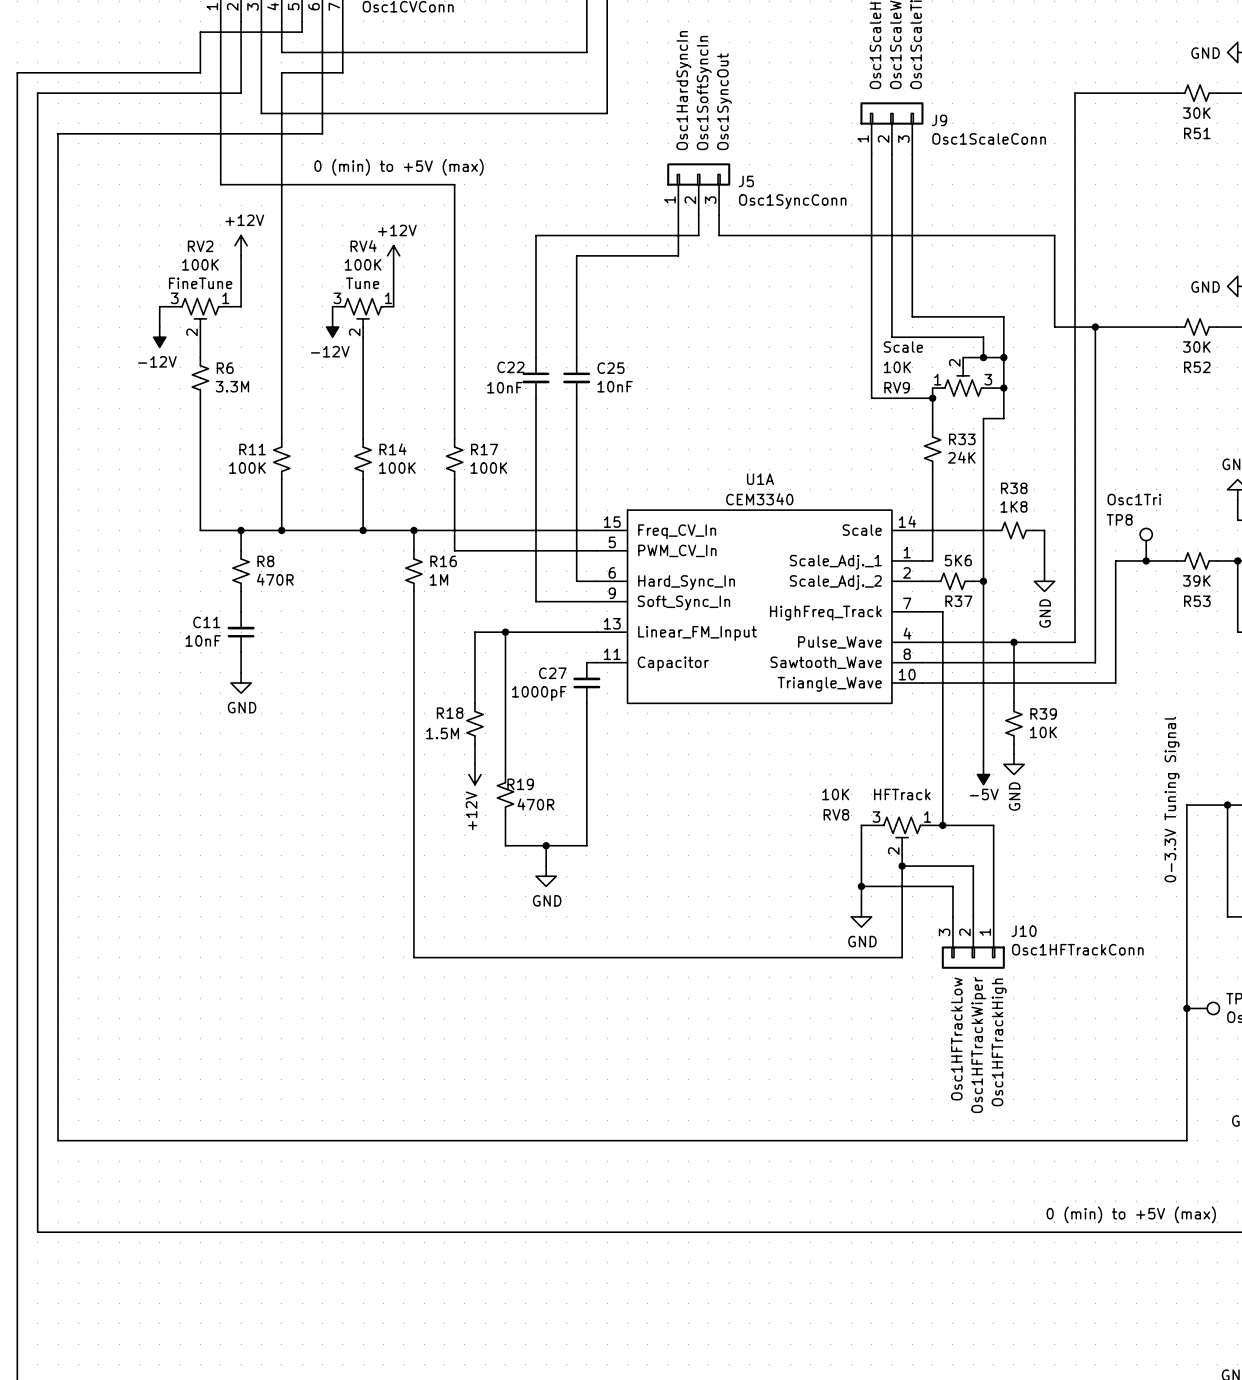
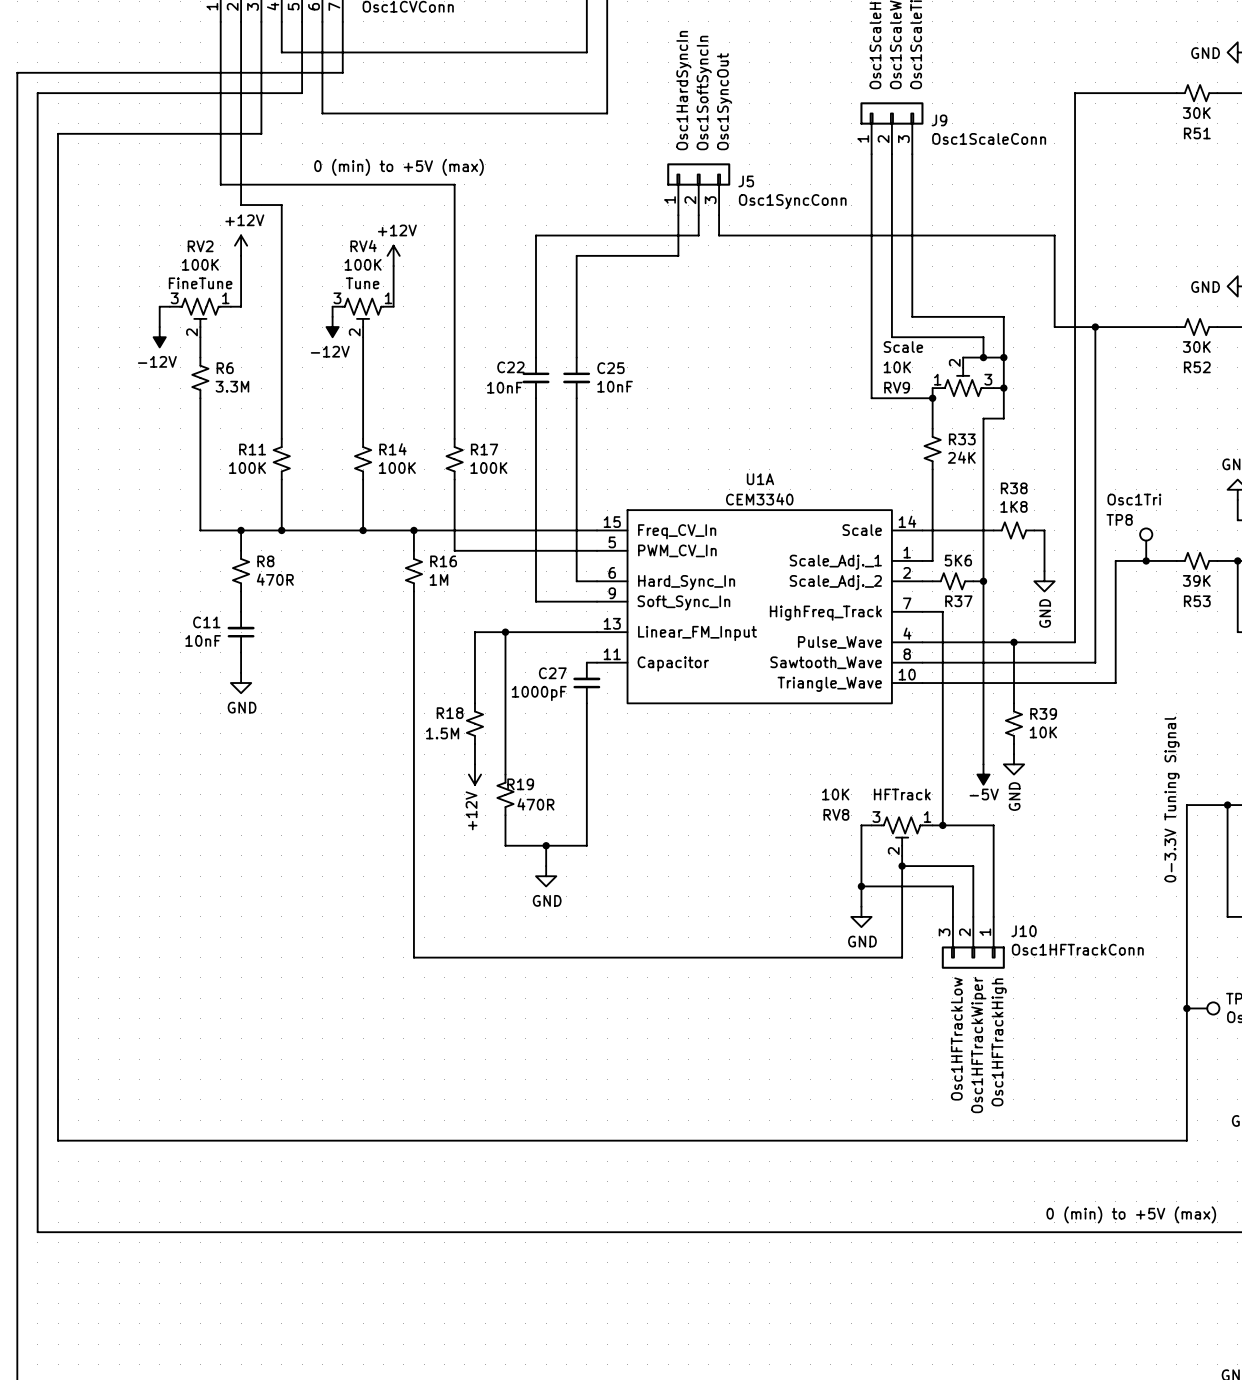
wire: (302, 32) (200, 32) (200, 72) -> (281, 72) (200, 72)
wire: (281, 72) (281, 205) -> (302, 32) (302, 93) (241, 93) (241, 205) (281, 205)
wire: (261, 113) (322, 113) (322, 133) (261, 133) -> (261, 113) (261, 133)

